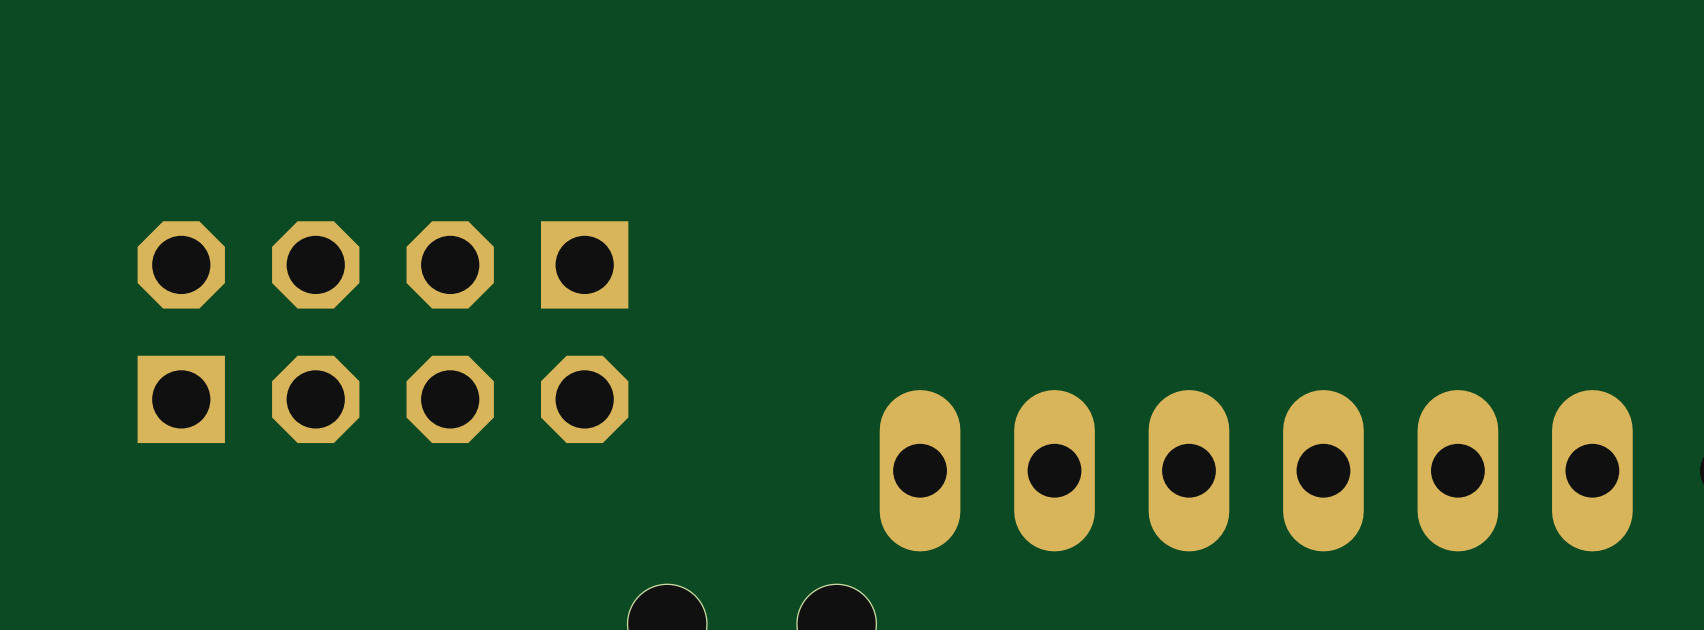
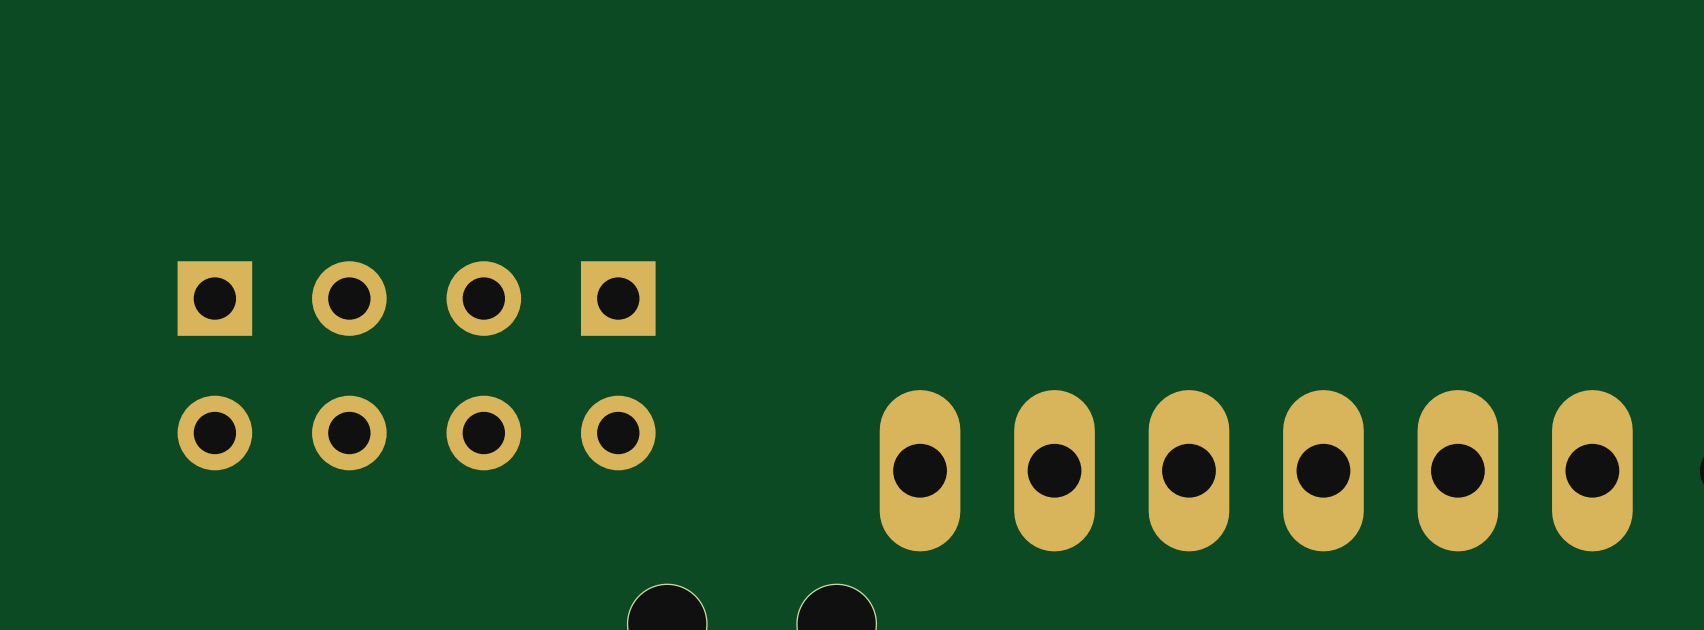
part footprint: [137, 221, 629, 444] -> [177, 261, 656, 471]

